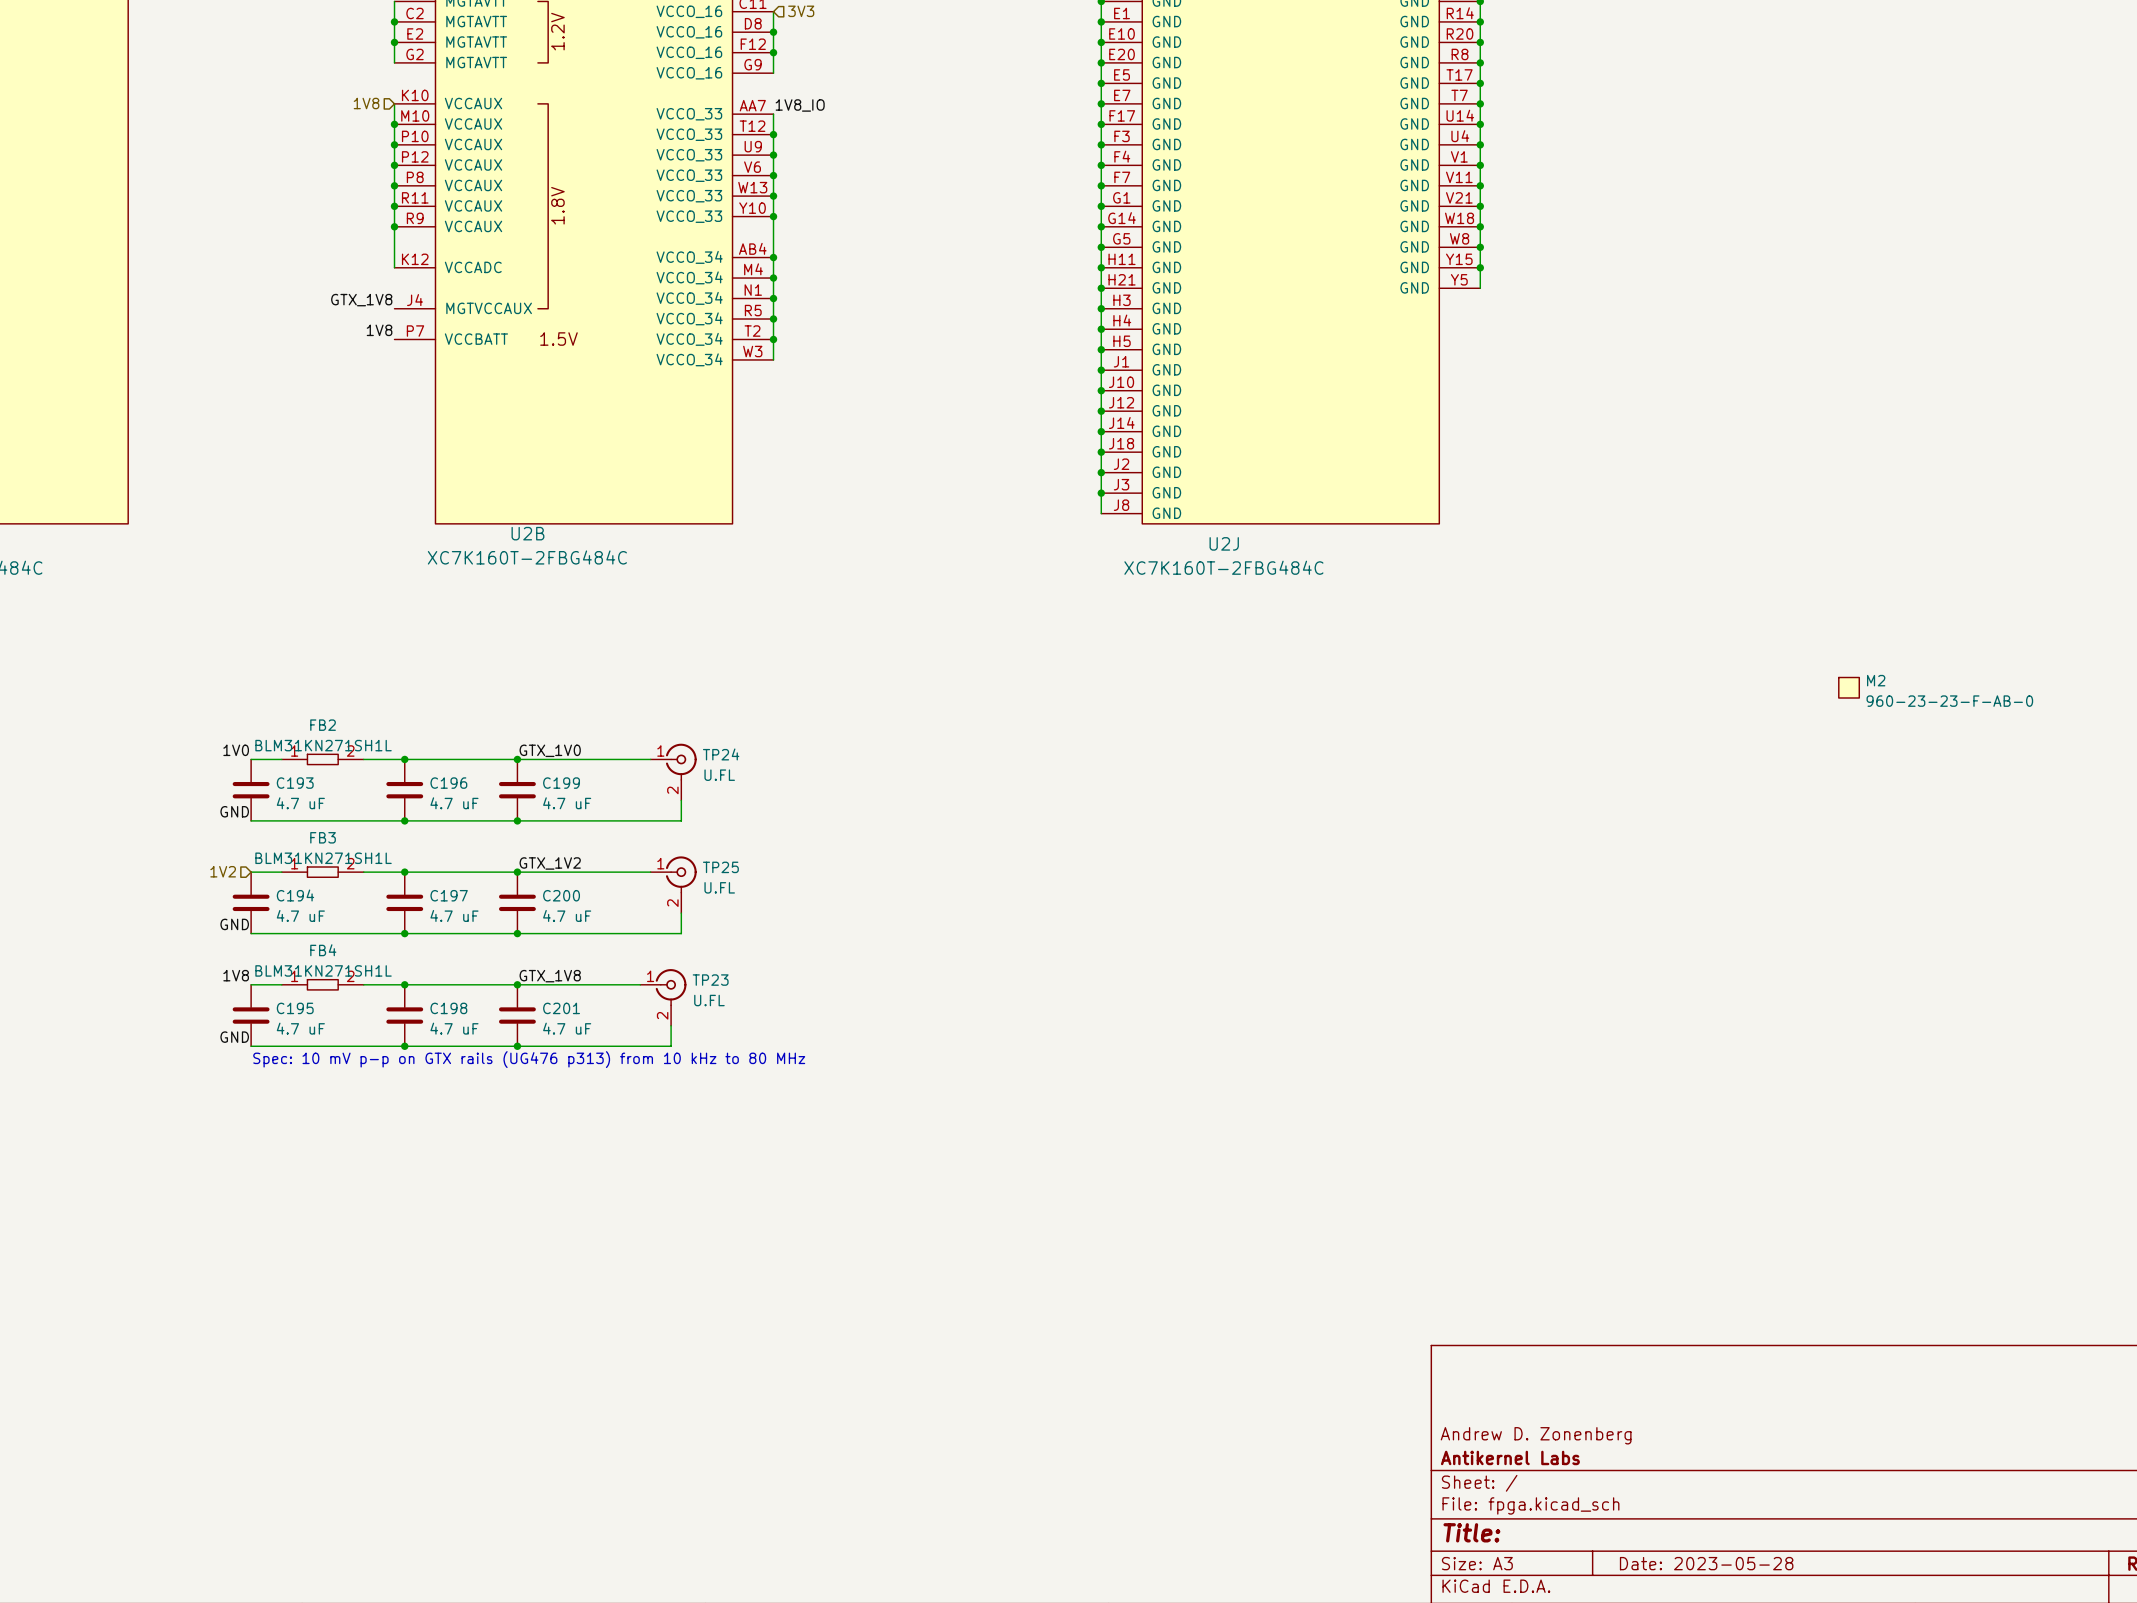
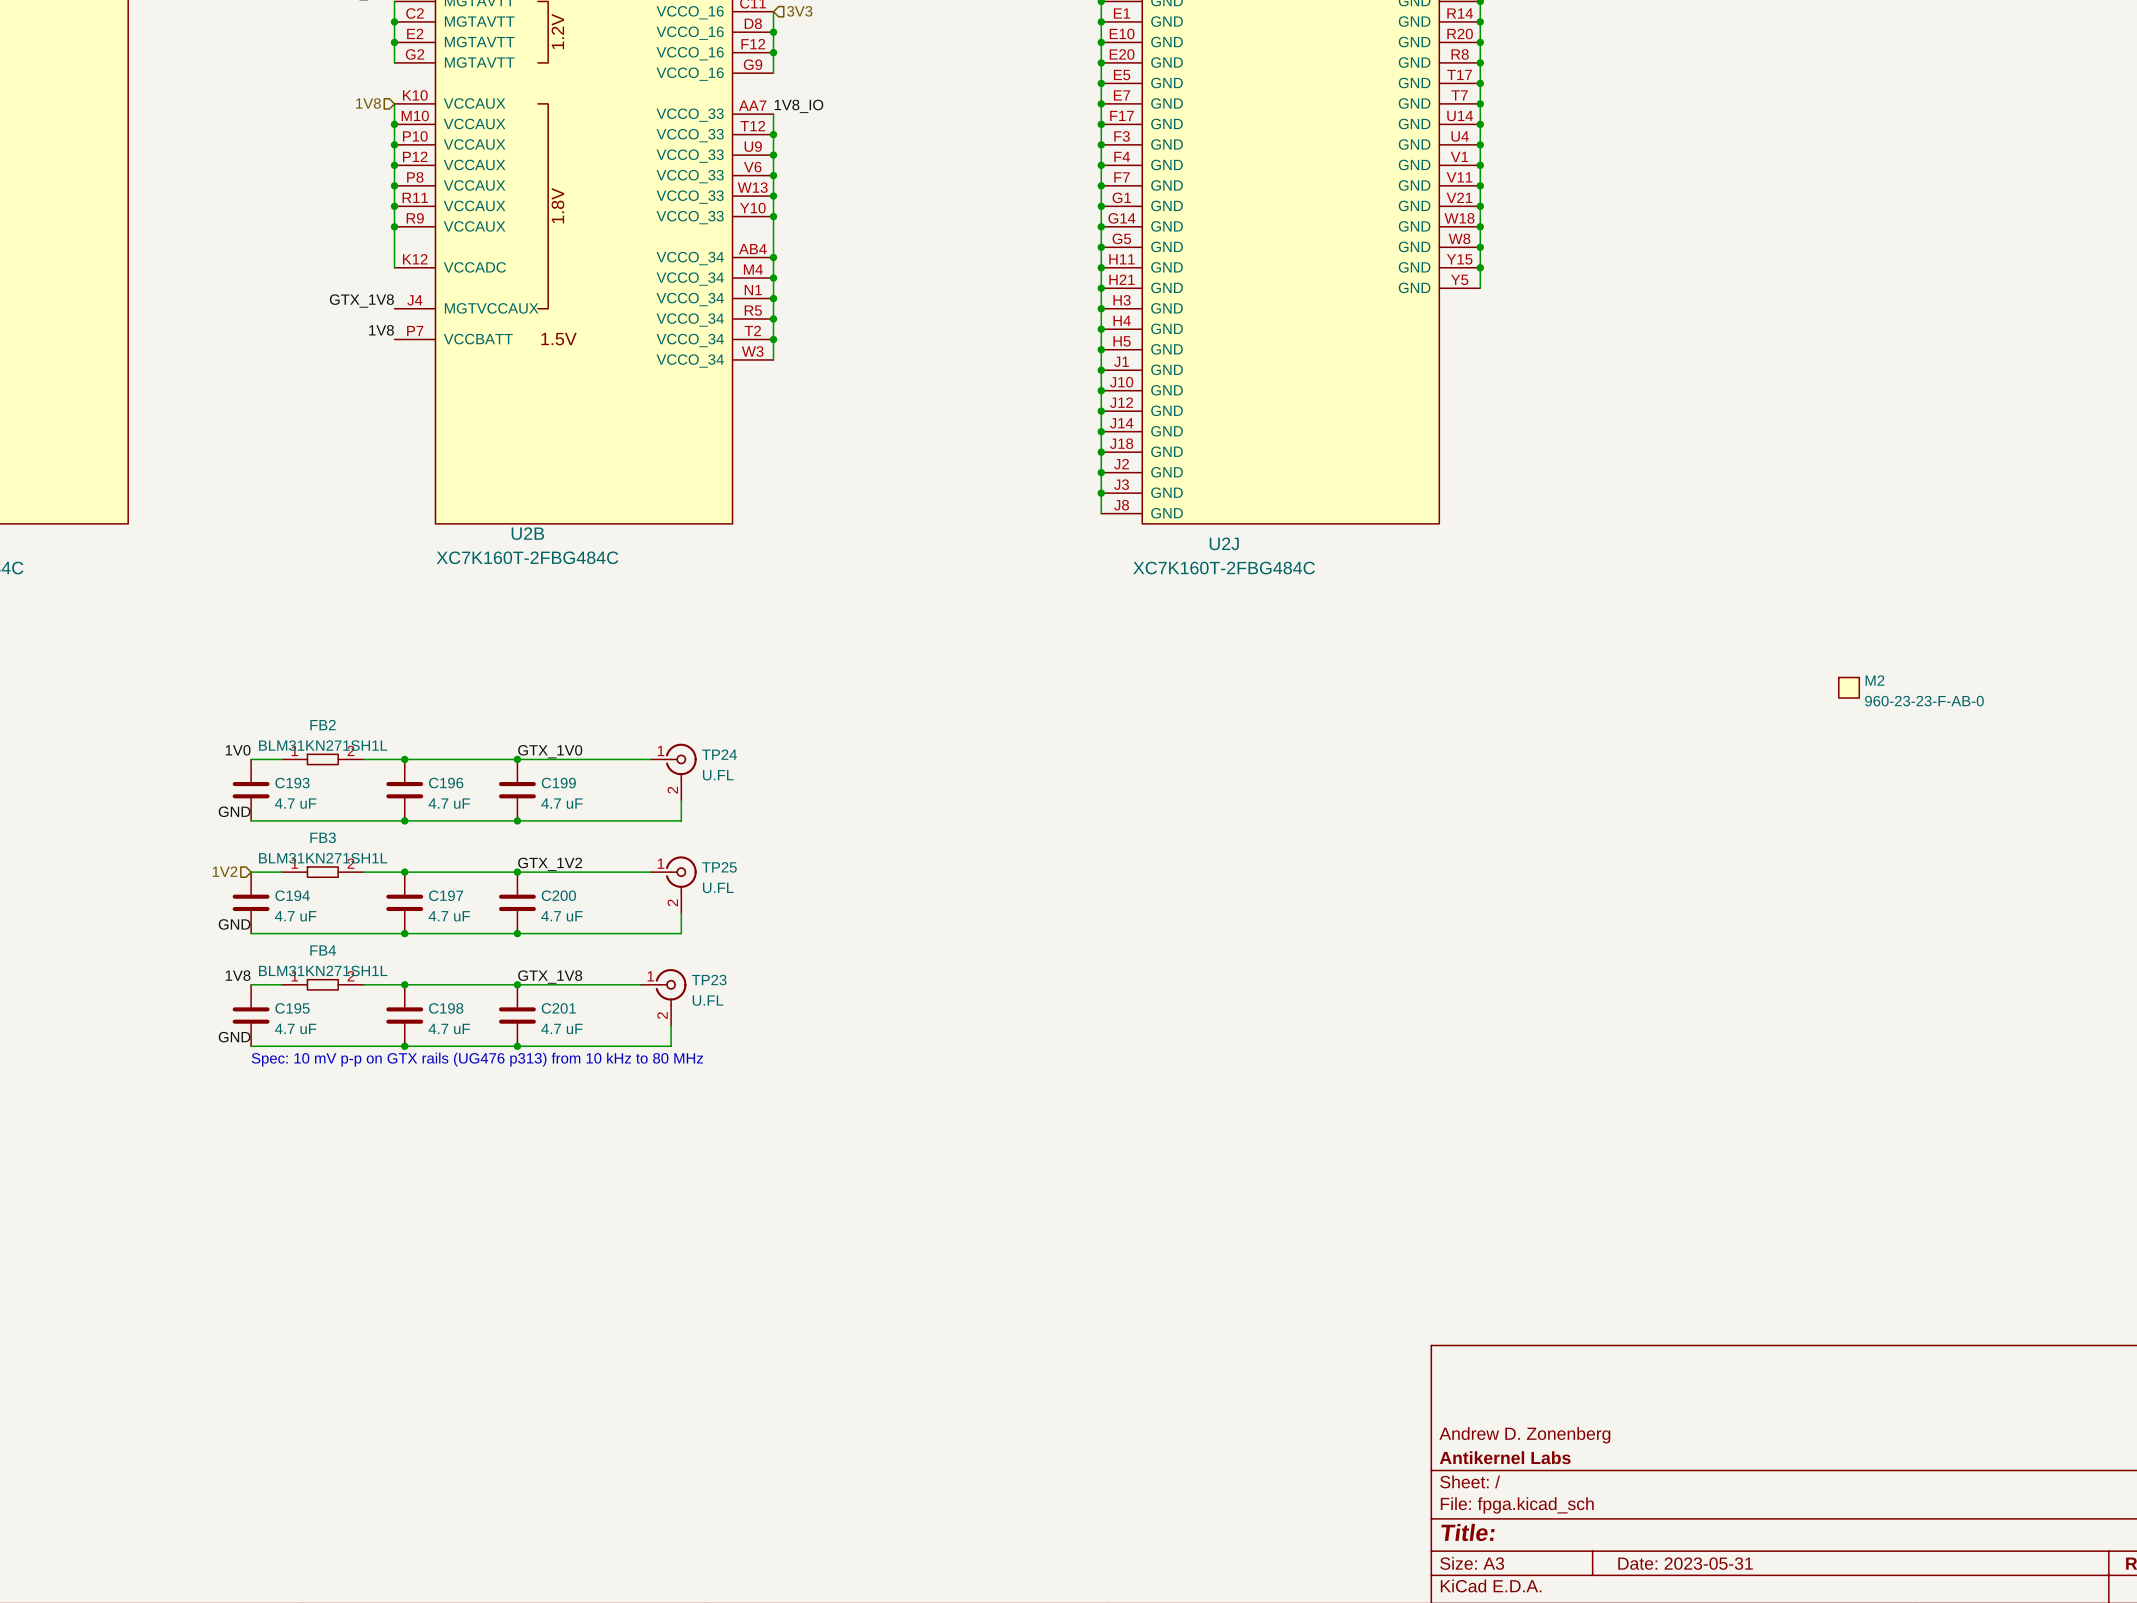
title block: Date: 2023-05-28 (1706, 1563) -> Date: 2023-05-31 (1685, 1563)

